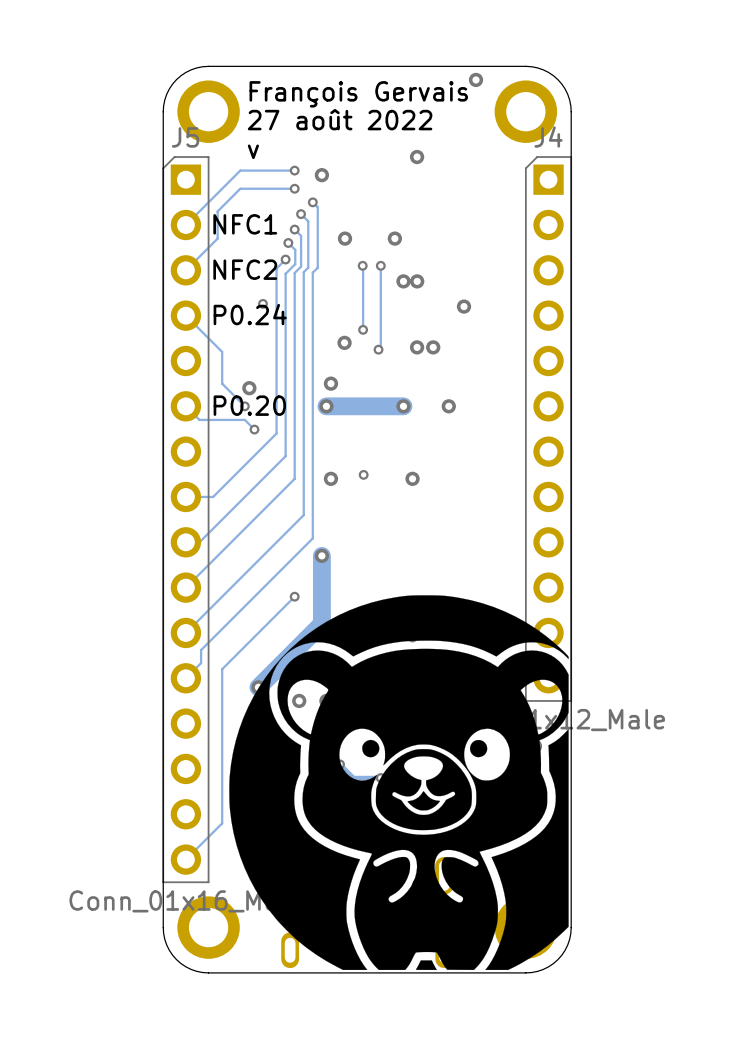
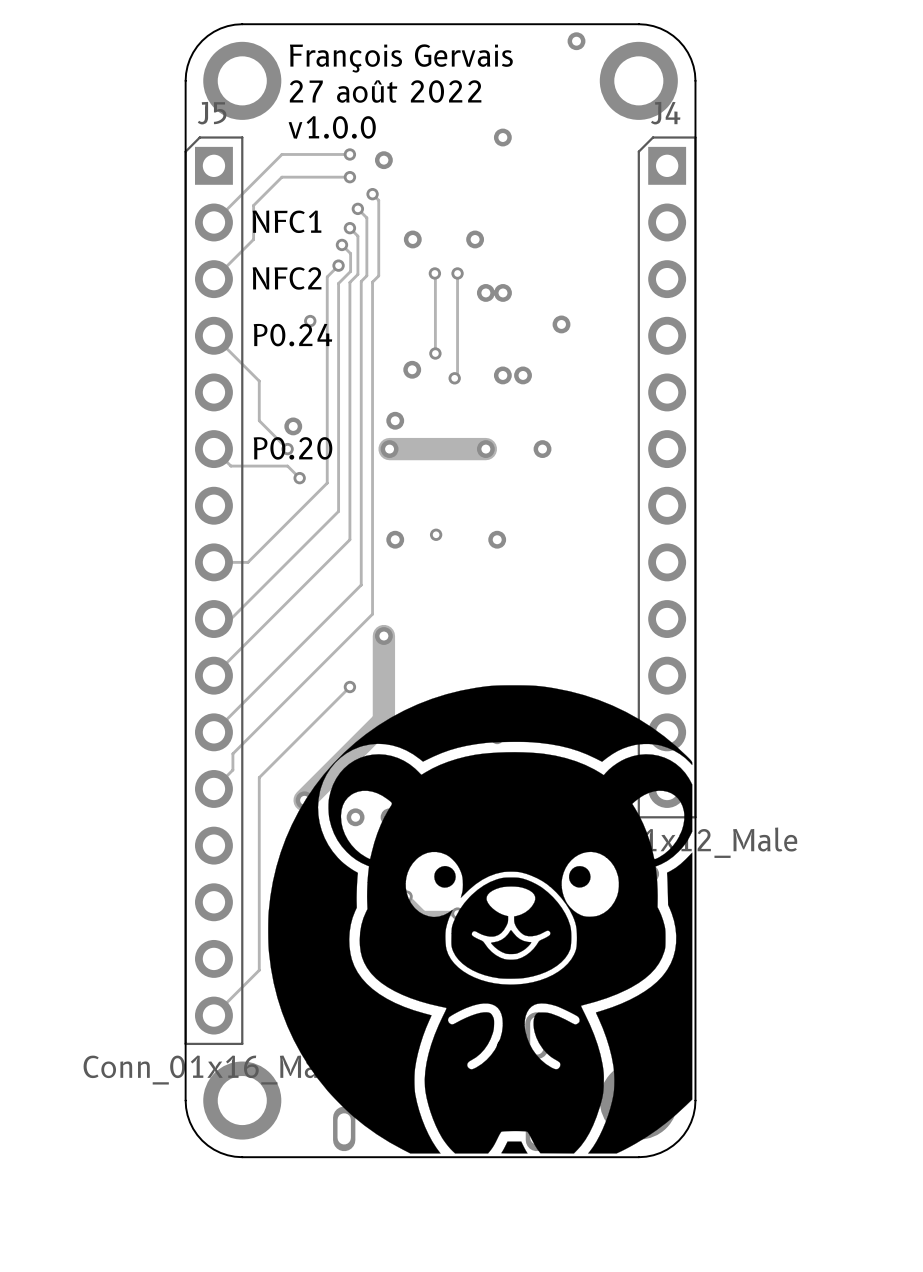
text: v (253, 151) -> v1.0.0 (332, 127)

